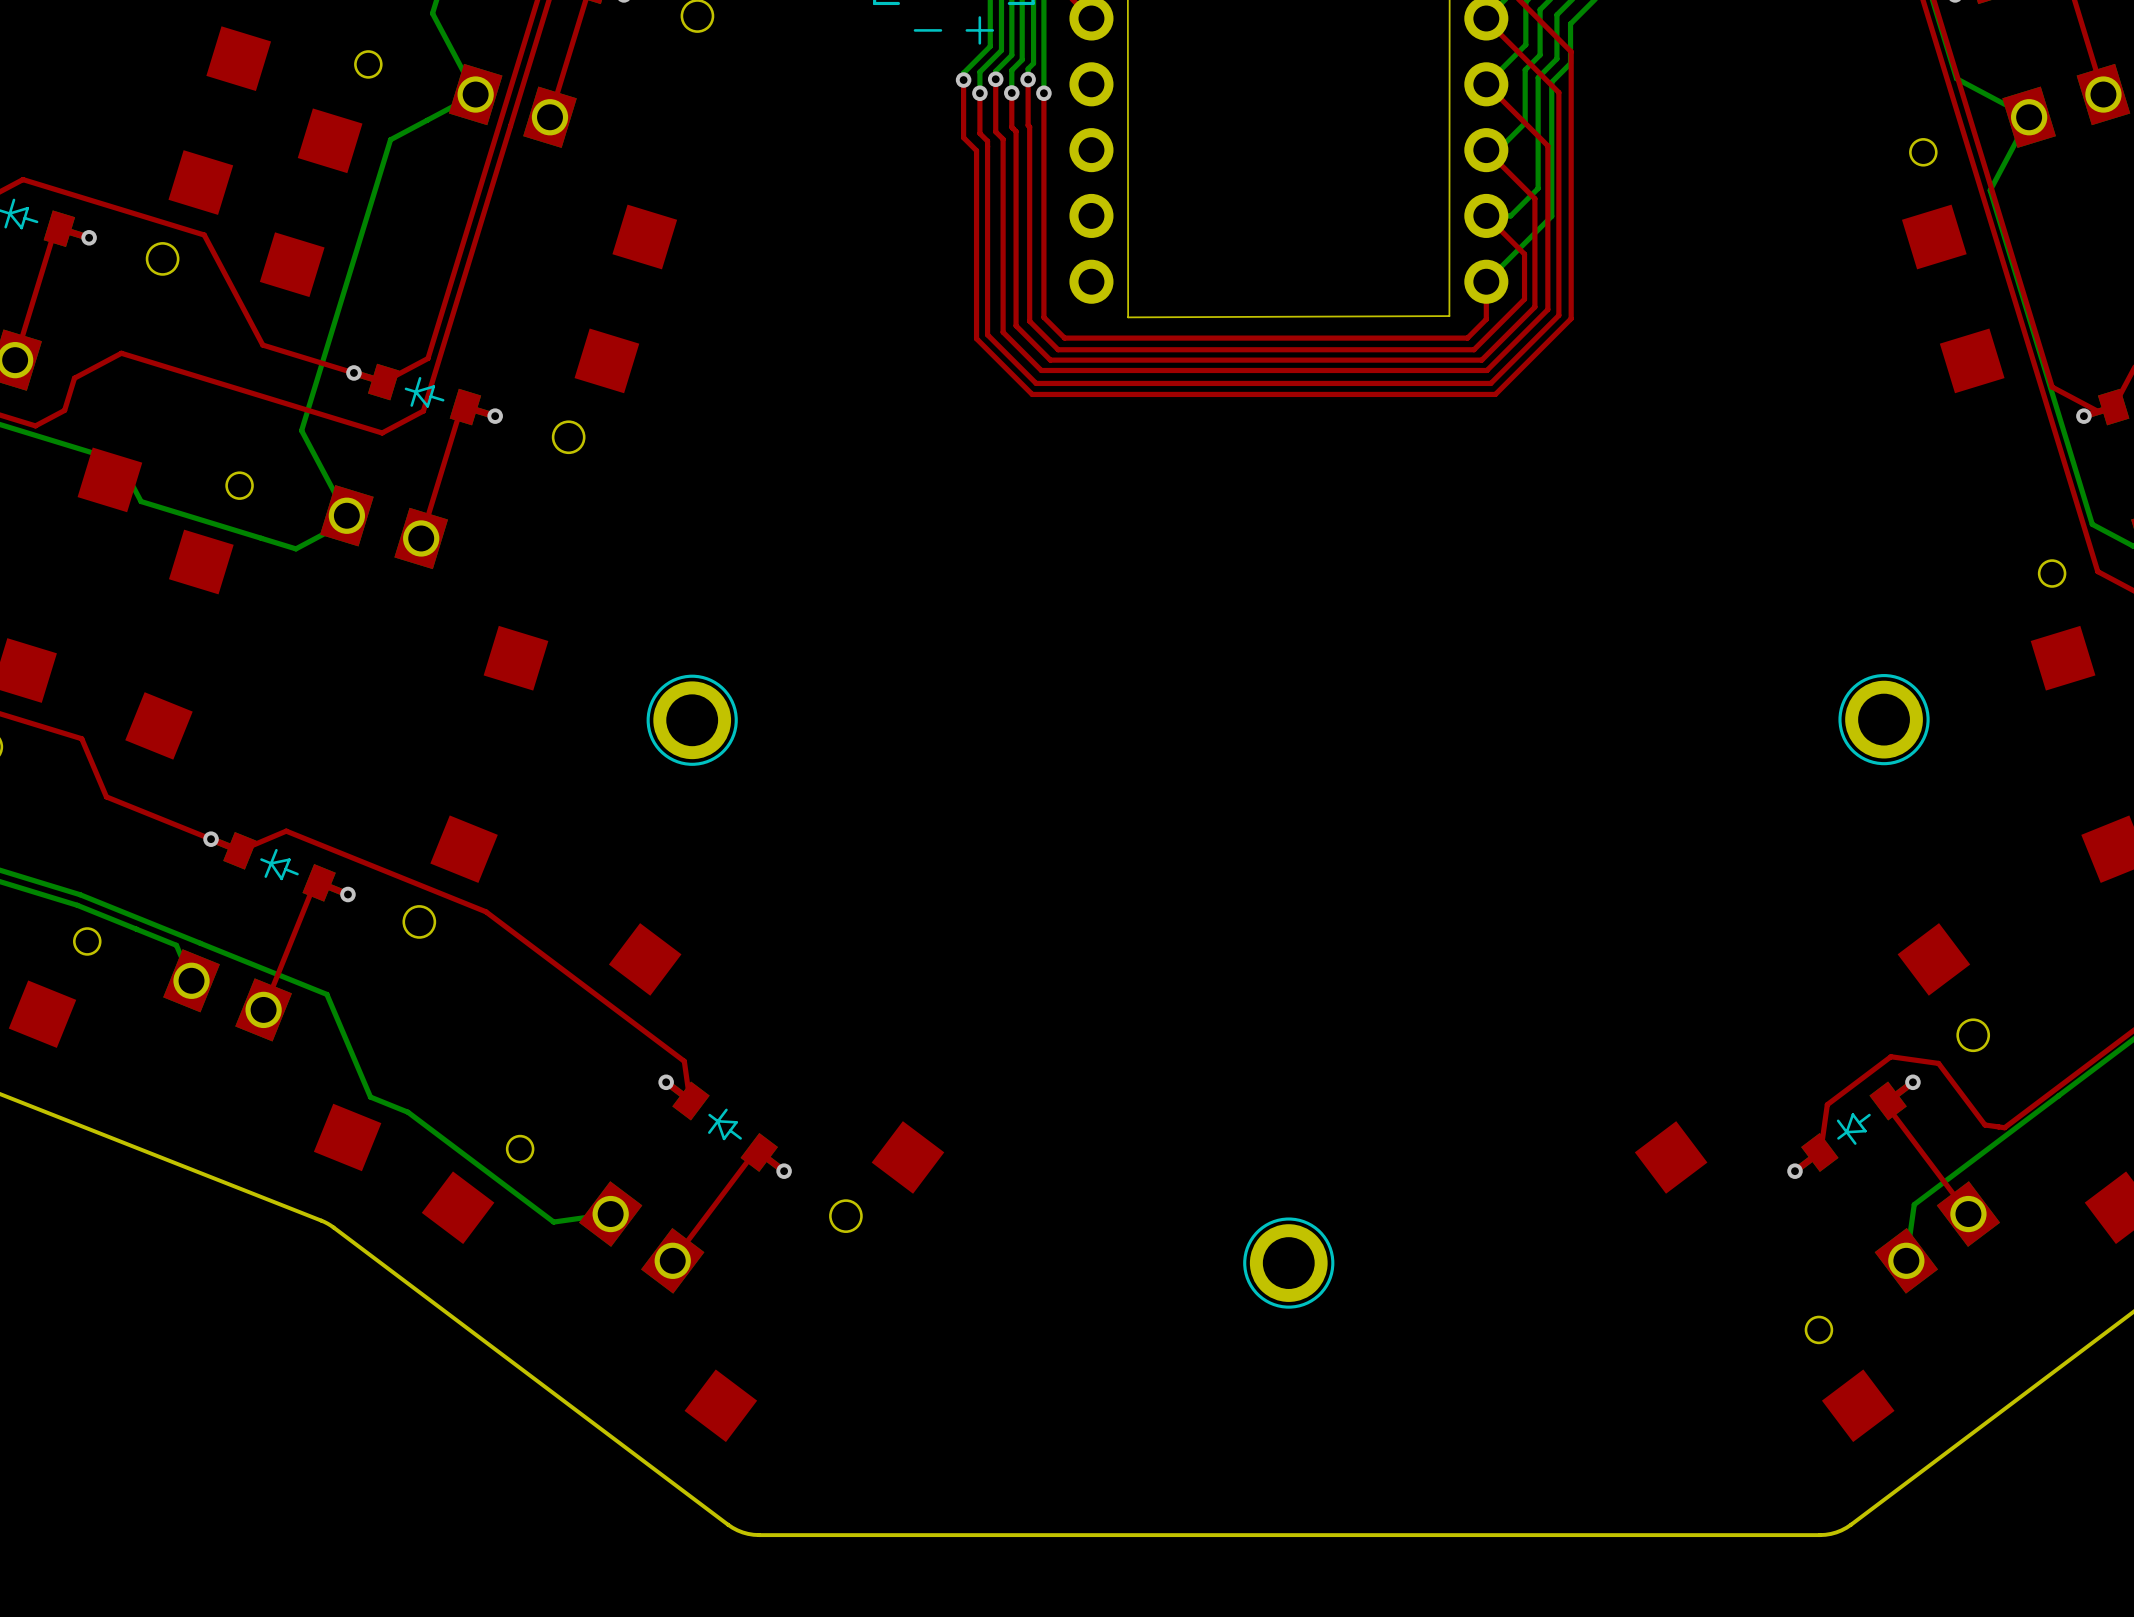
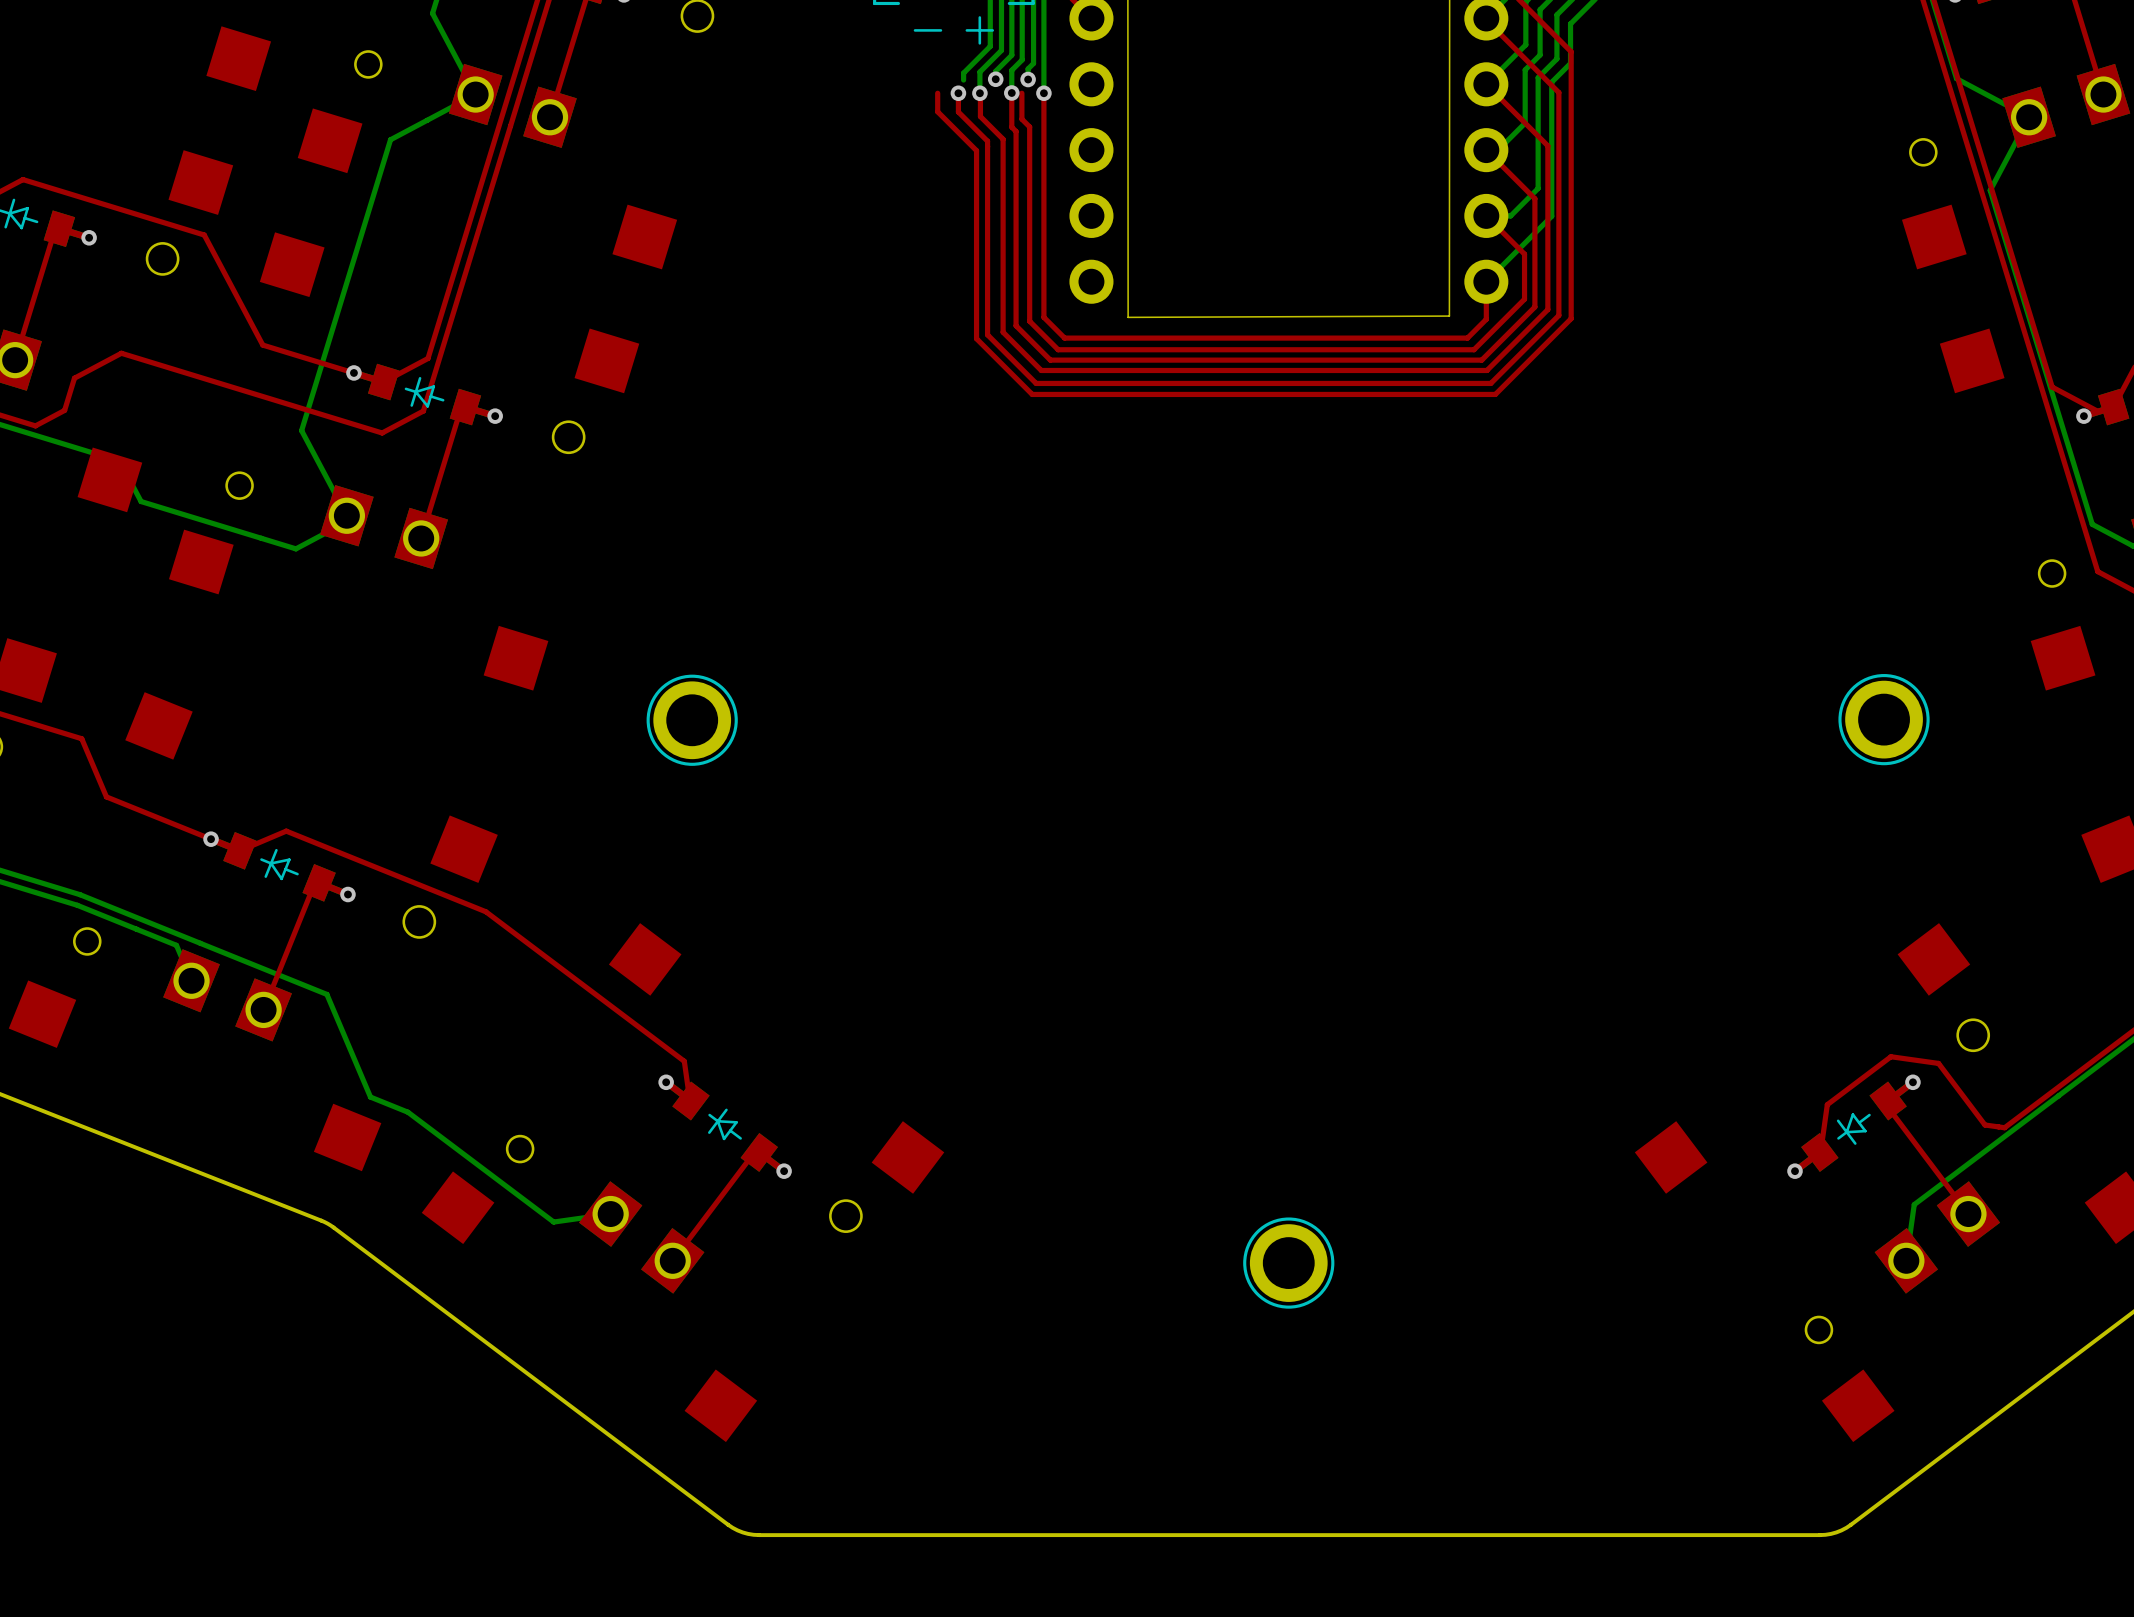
top track: (995, 79) (995, 131) -> (980, 97) (980, 116) (995, 131)
top track: (1028, 79) (1028, 125) -> (1021, 93) (1021, 119) (1028, 125)
top track: (963, 80) (963, 137) -> (937, 93) (937, 111) (963, 137)
via position: (963, 80) -> (958, 93)
top track: (979, 93) (979, 133) -> (958, 93) (958, 112) (979, 133)

